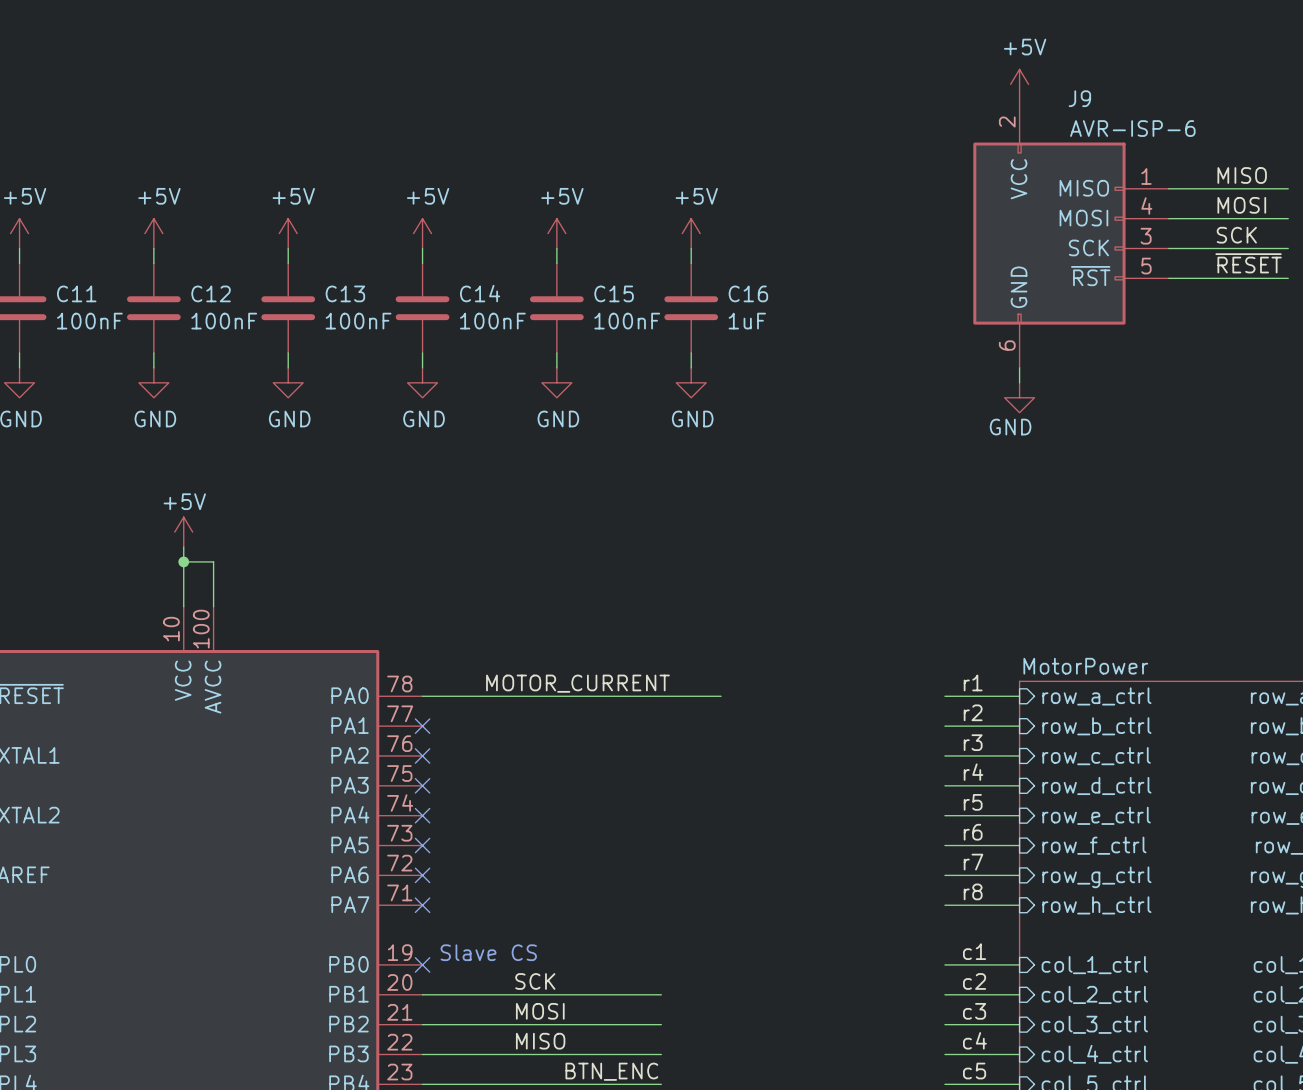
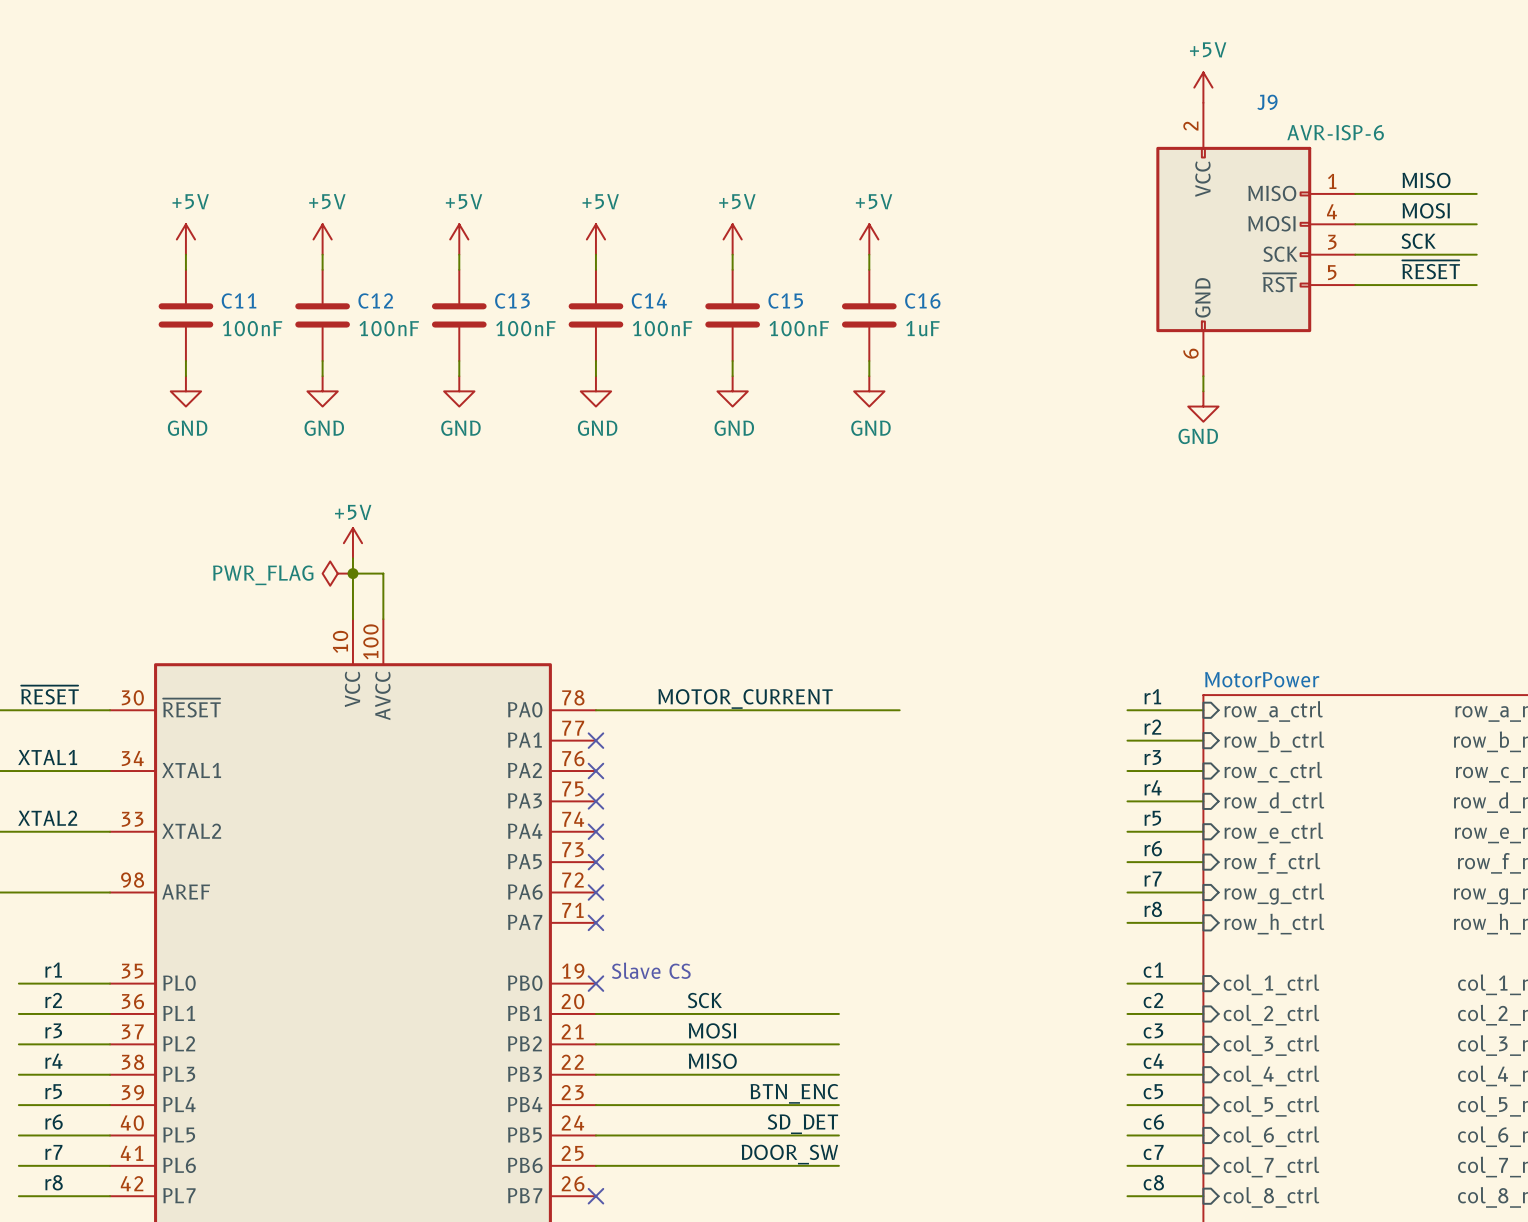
power symbol: none -> PWR_FLAG (337, 573)

